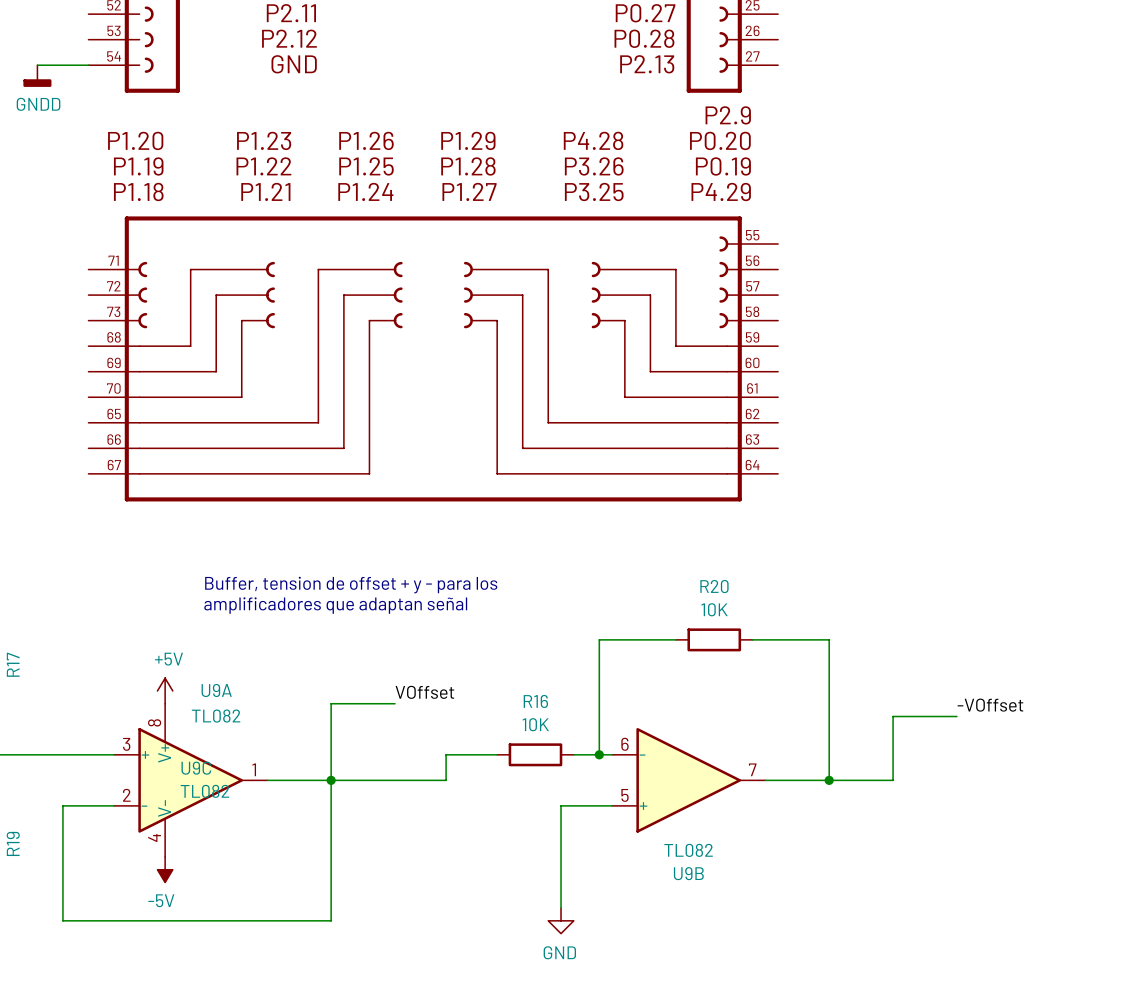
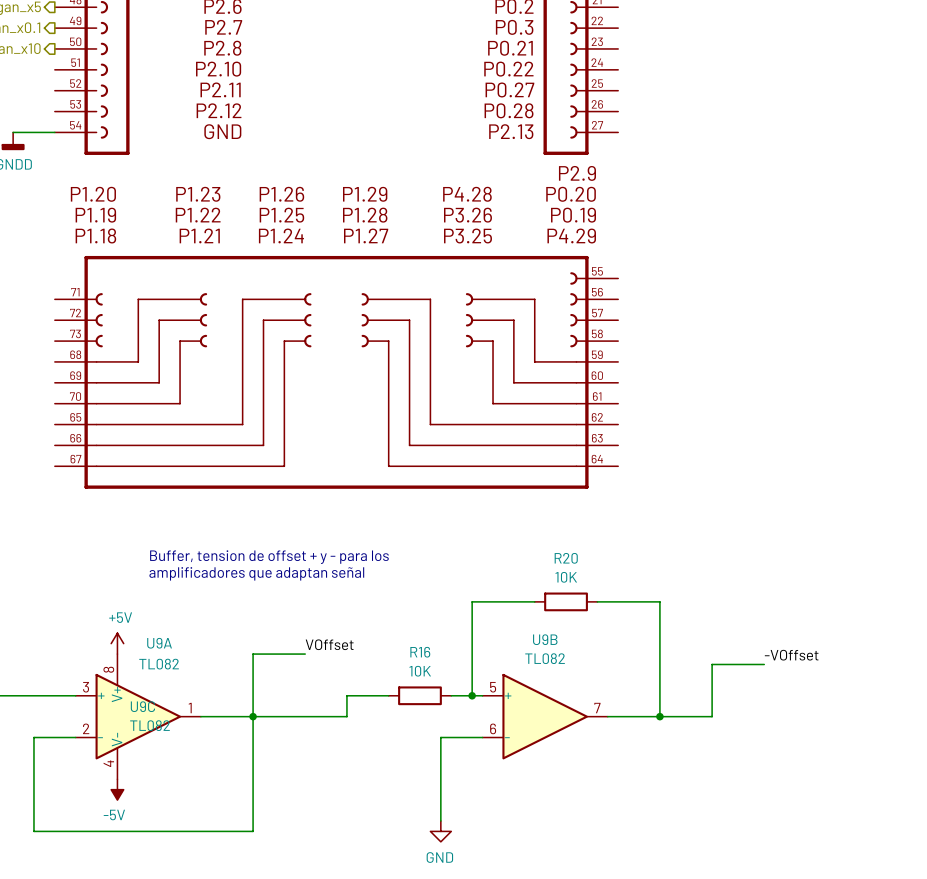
U9B flip: as is (688, 780) -> up-down (545, 716)

